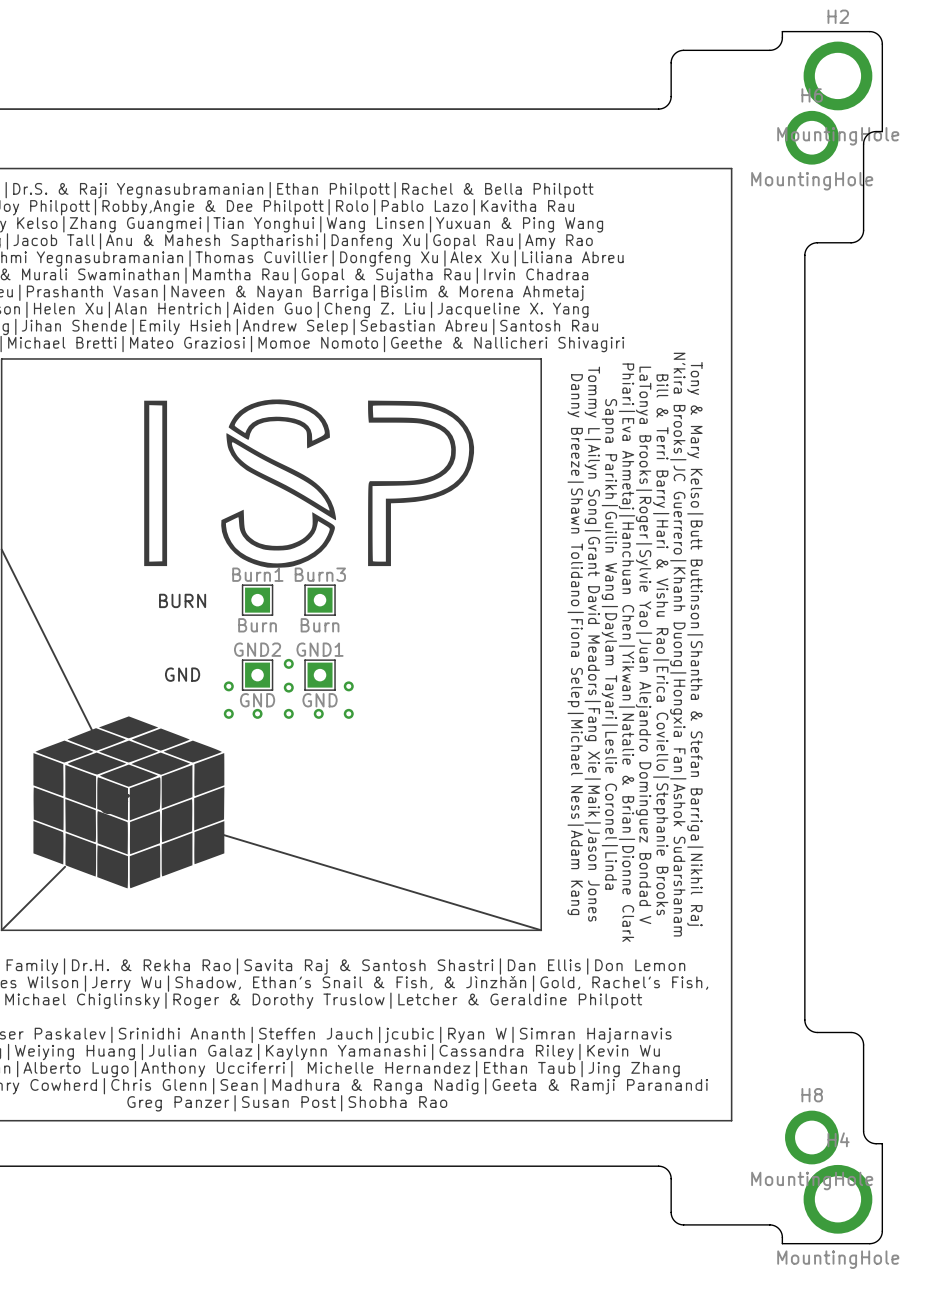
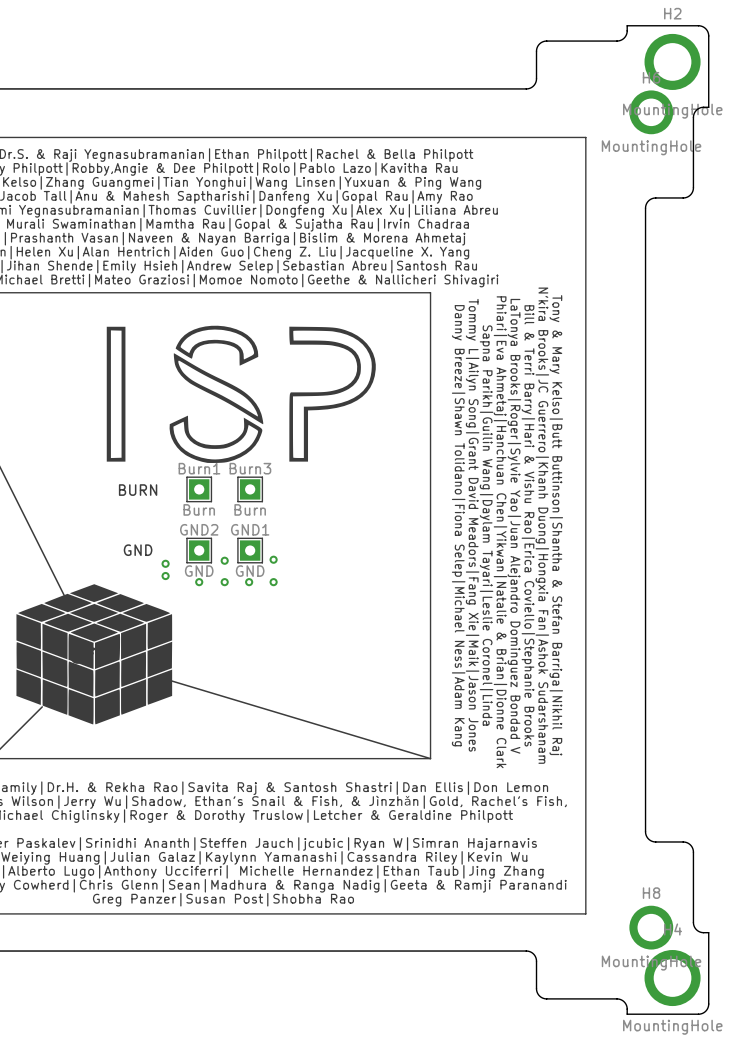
via: (288, 663) -> none
via: (228, 686) -> none
via: none -> (165, 563)
via: none -> (165, 576)
via: (228, 713) -> none

